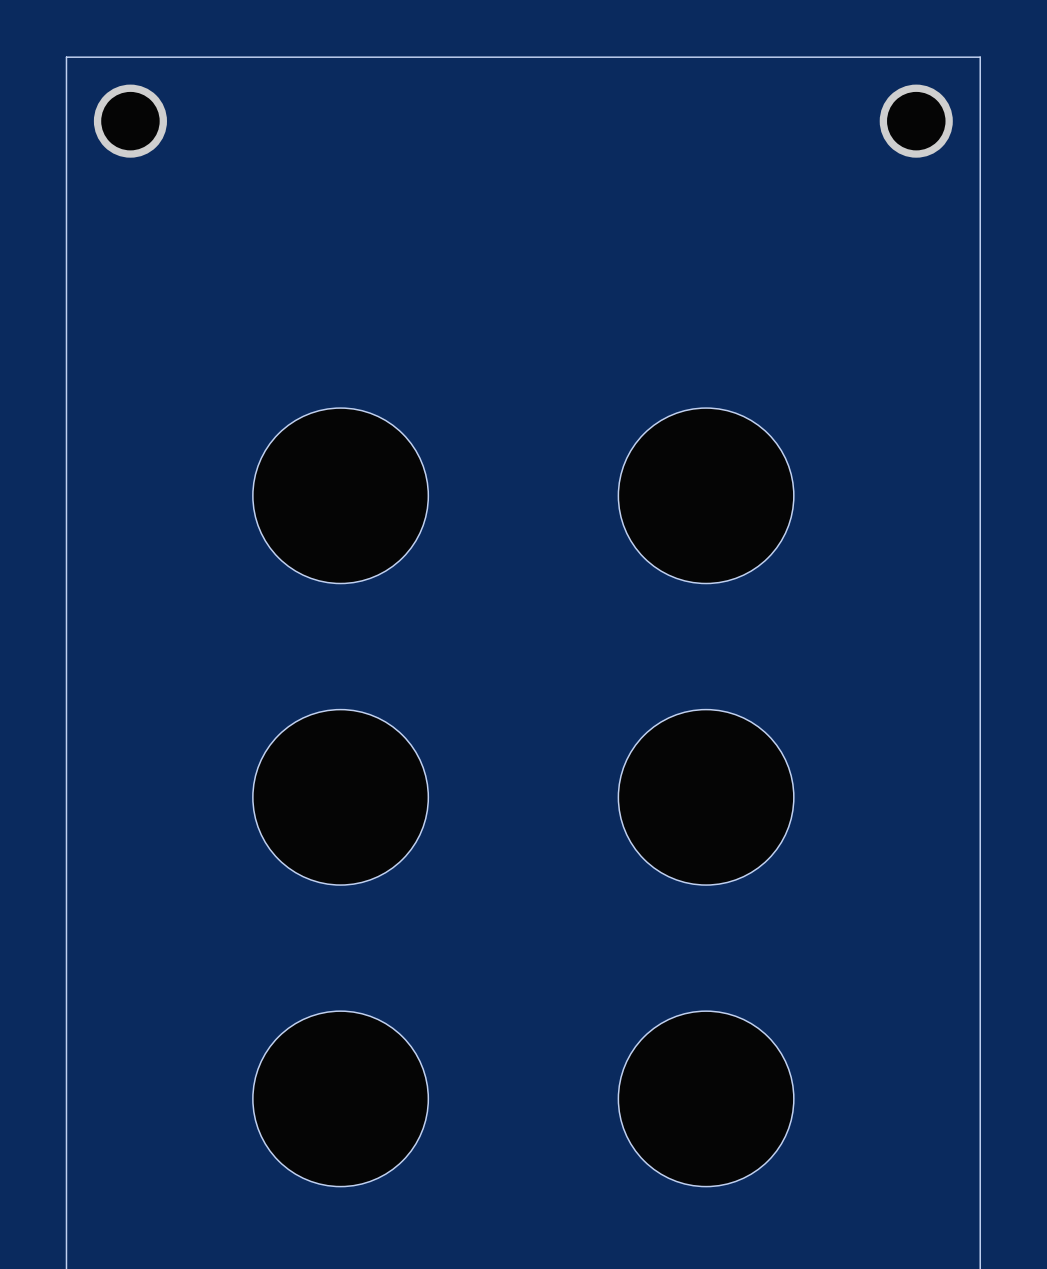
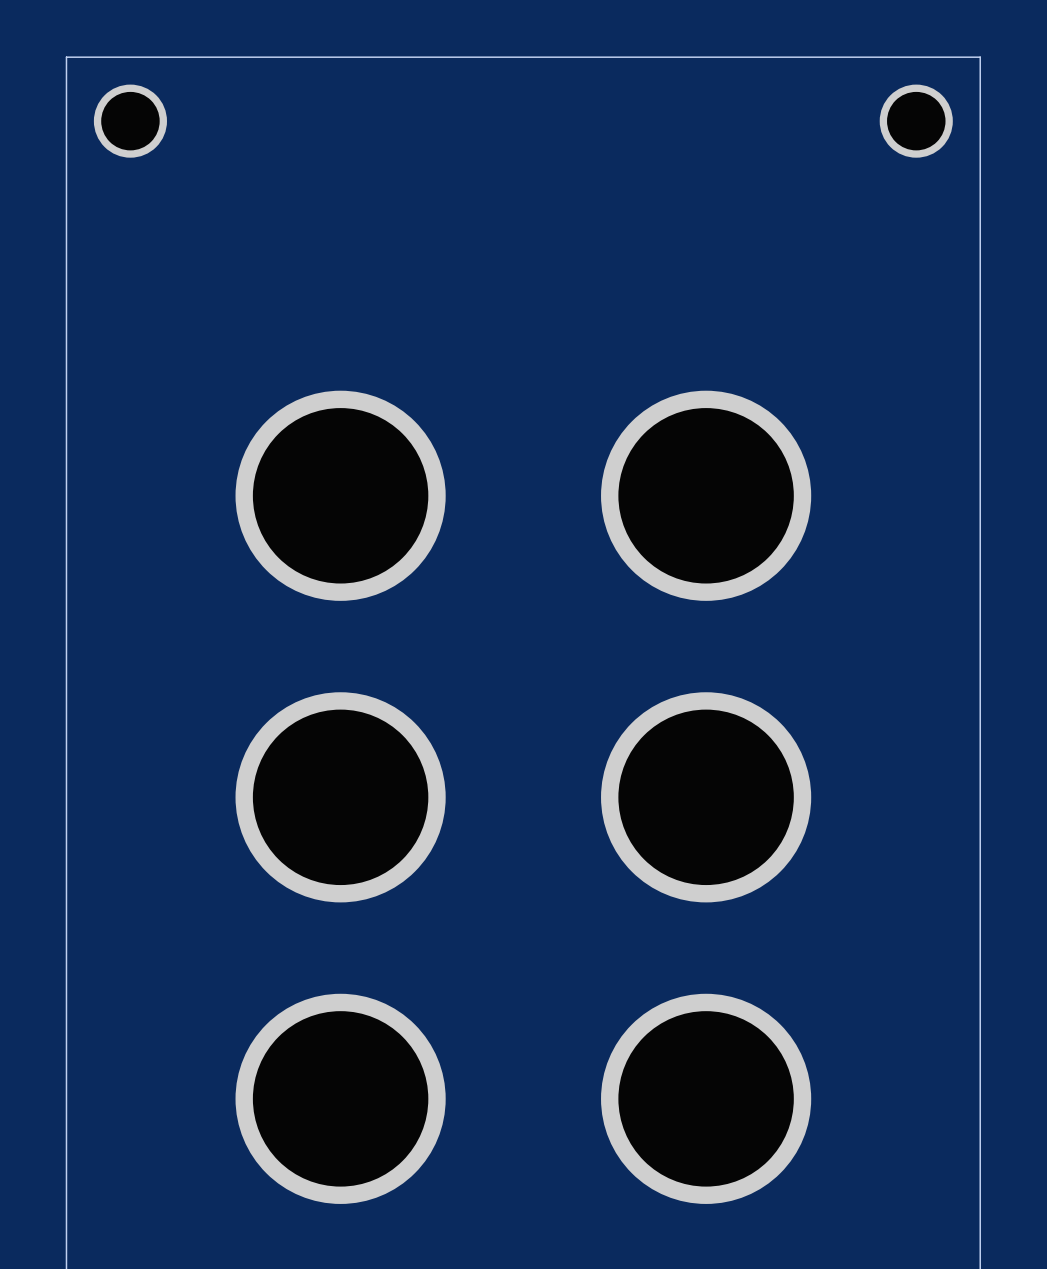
part footprint: [252, 408, 429, 584] -> [235, 390, 446, 601]
part footprint: [618, 408, 794, 584] -> [601, 390, 812, 601]
part footprint: [252, 709, 429, 886] -> [235, 692, 446, 903]
part footprint: [618, 709, 794, 886] -> [601, 692, 812, 903]
part footprint: [252, 1011, 429, 1187] -> [235, 993, 446, 1204]
part footprint: [618, 1011, 794, 1187] -> [601, 993, 812, 1204]

